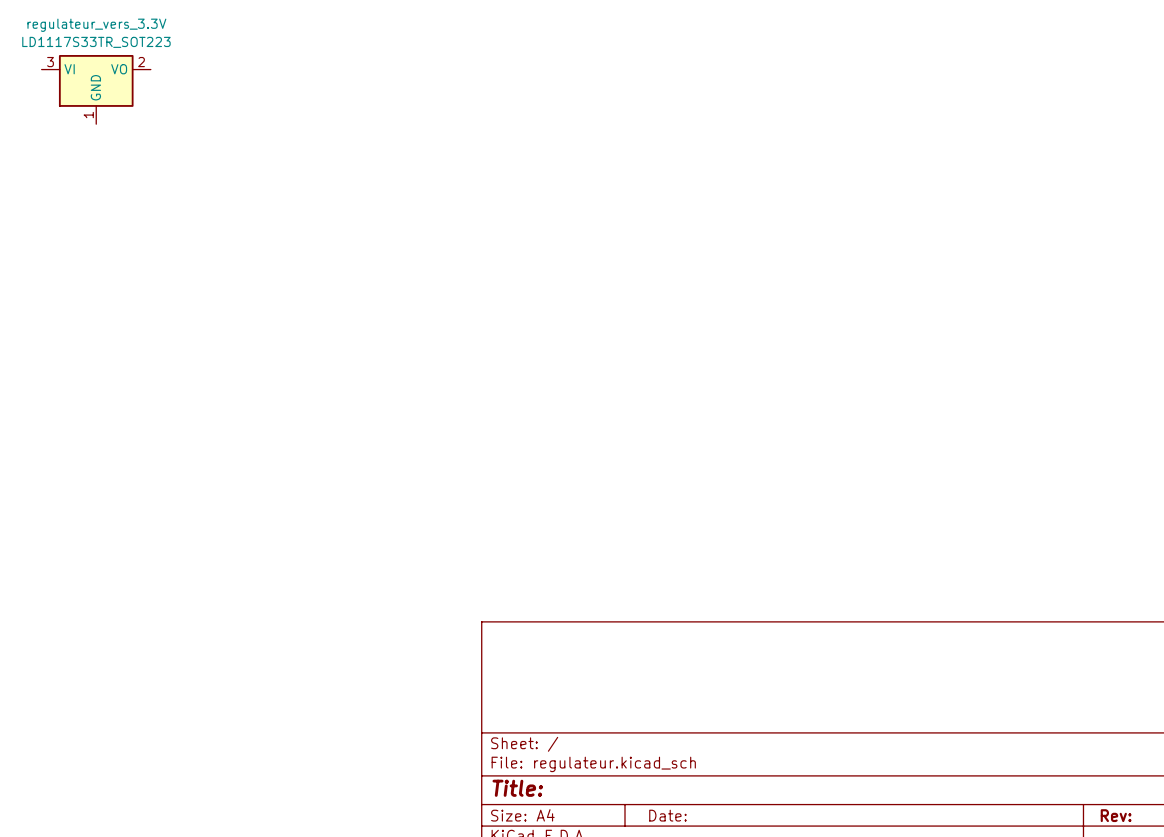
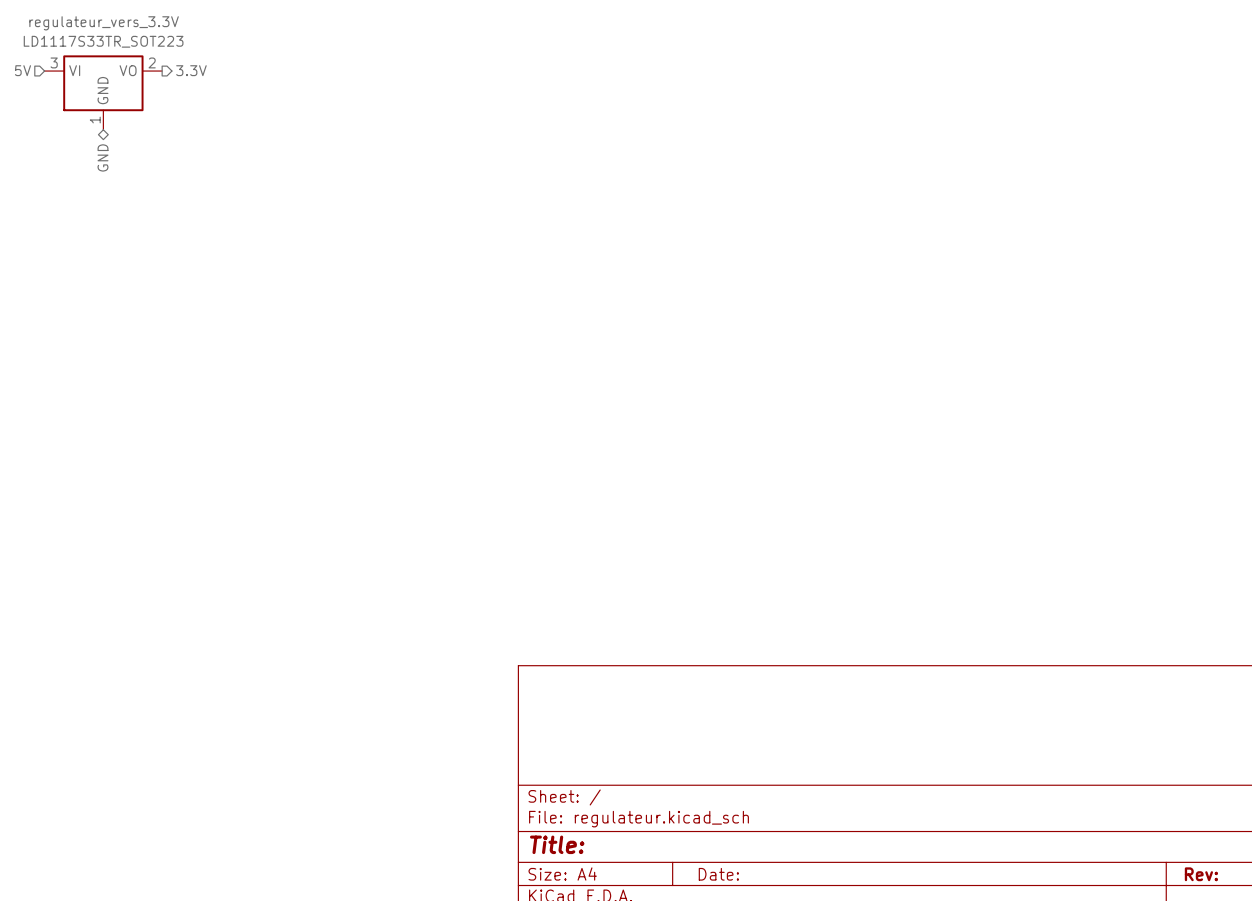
hierarchical label: none -> 5V (22, 70)
hierarchical label: none -> 3.3V (191, 70)
hierarchical label: none -> GND (103, 157)

